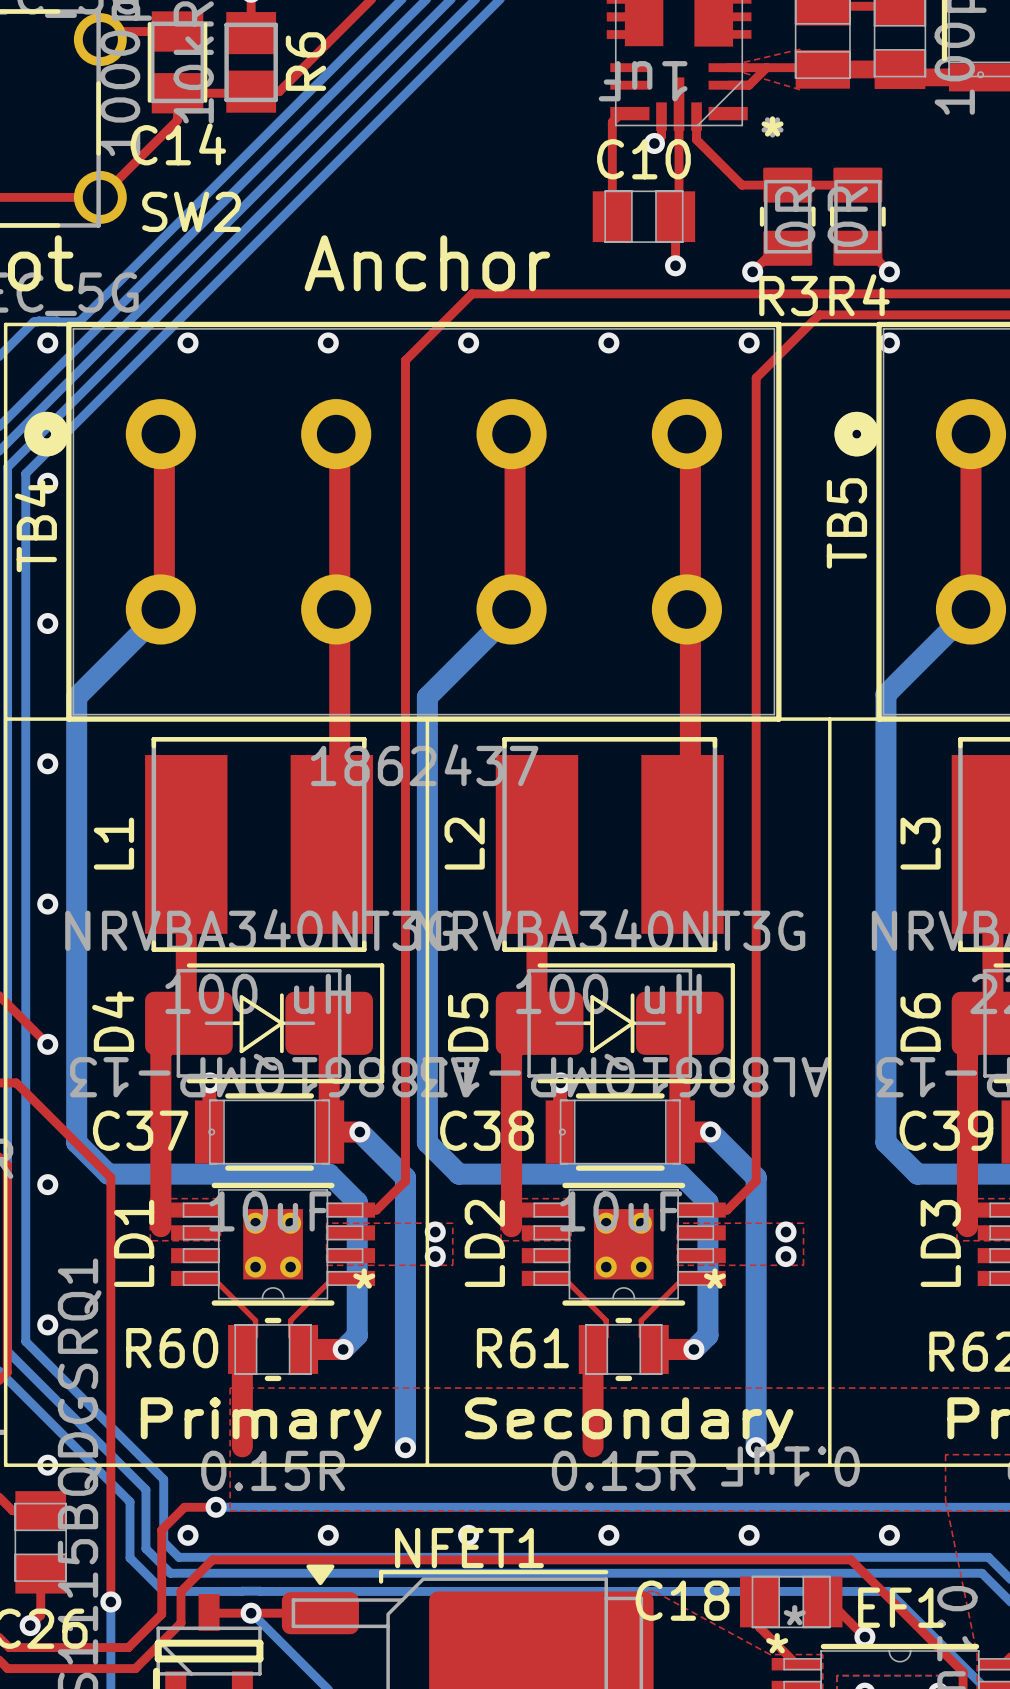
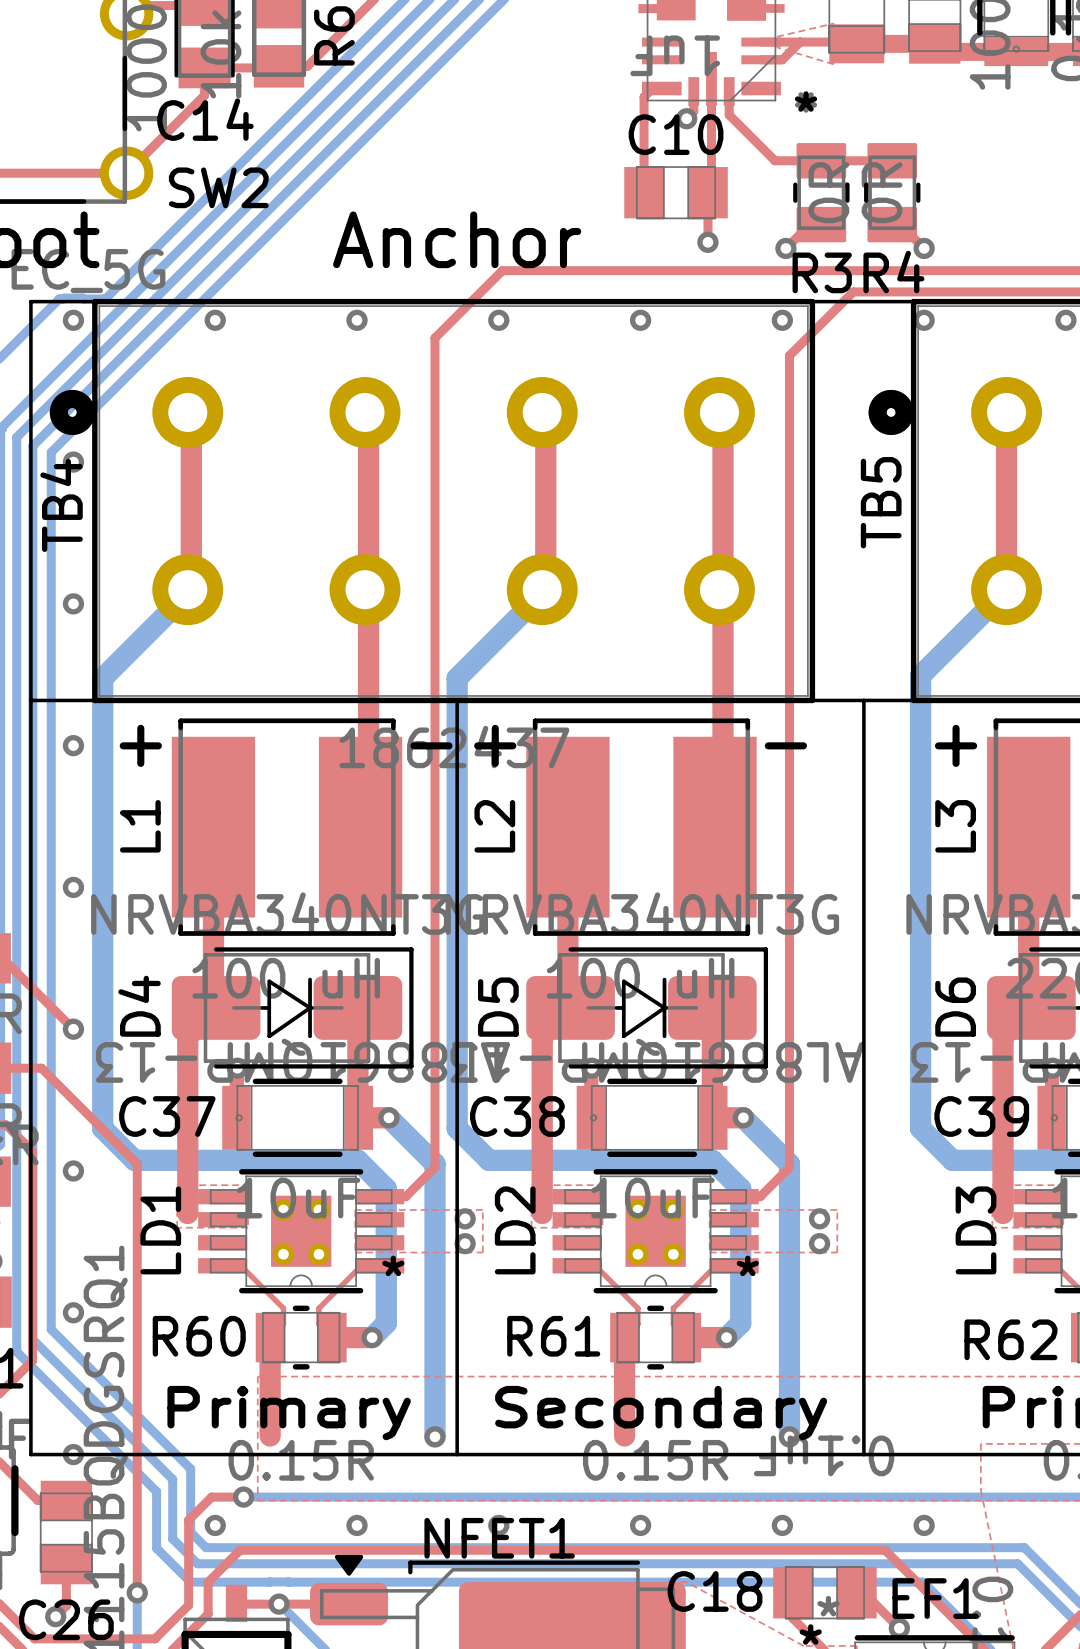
text: none -> + (140, 745)
text: none -> - (431, 745)
text: none -> + (495, 745)
text: none -> - (785, 745)
text: none -> + (956, 745)

